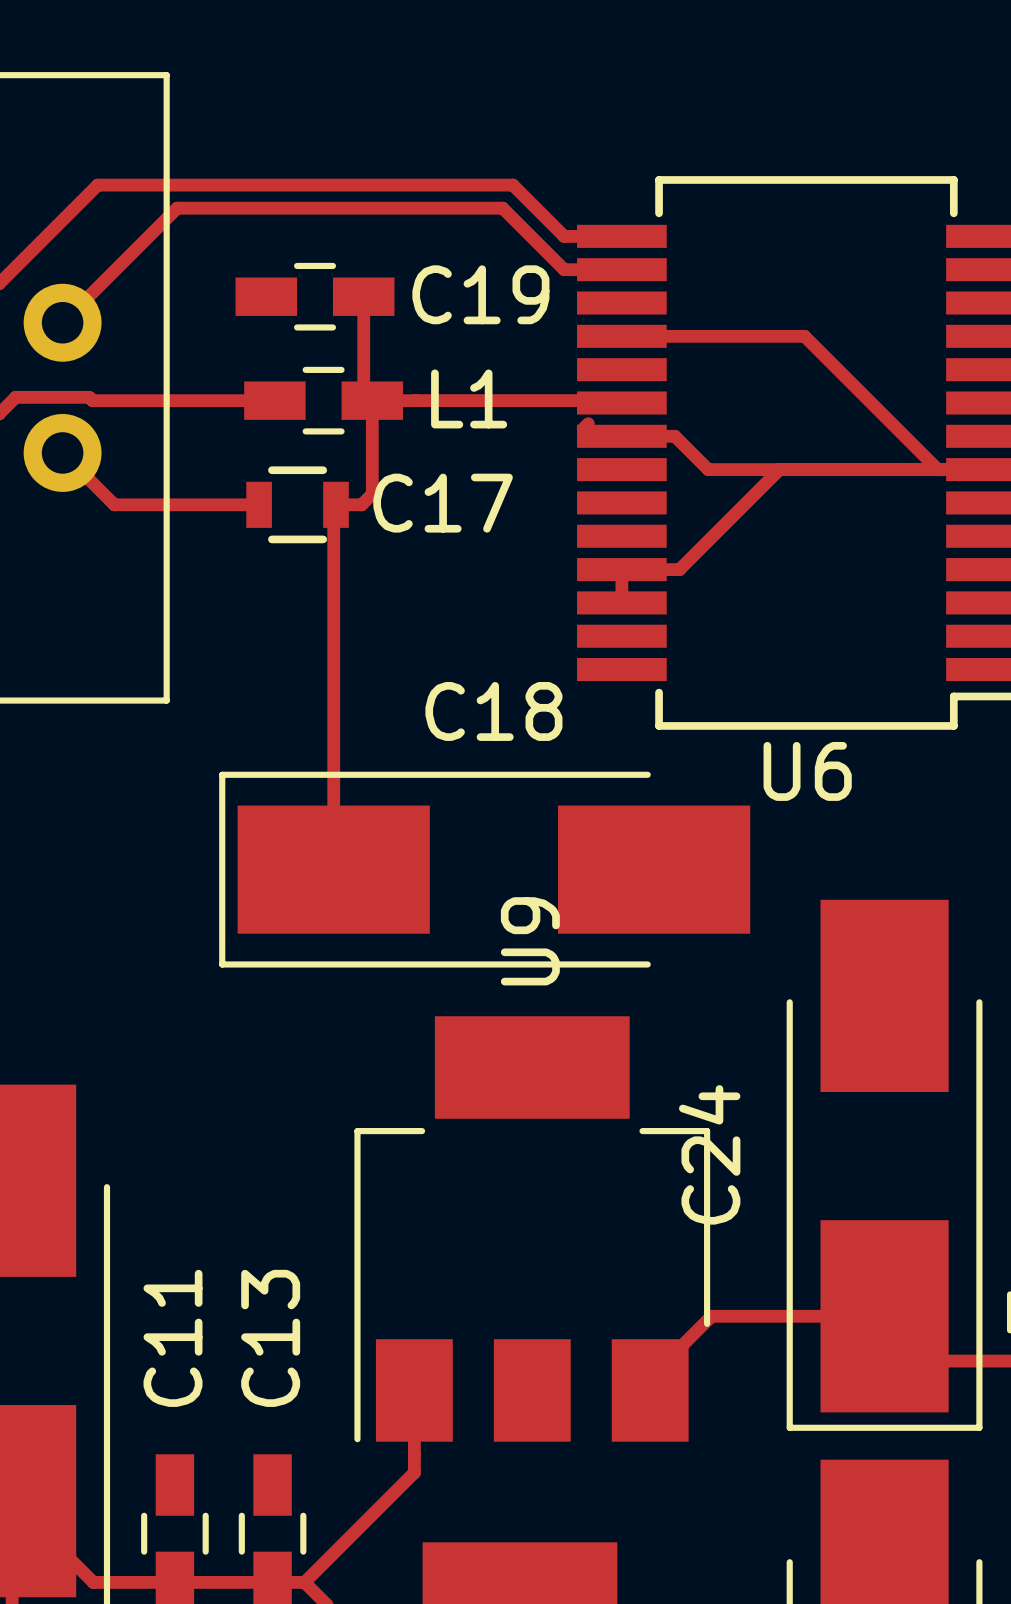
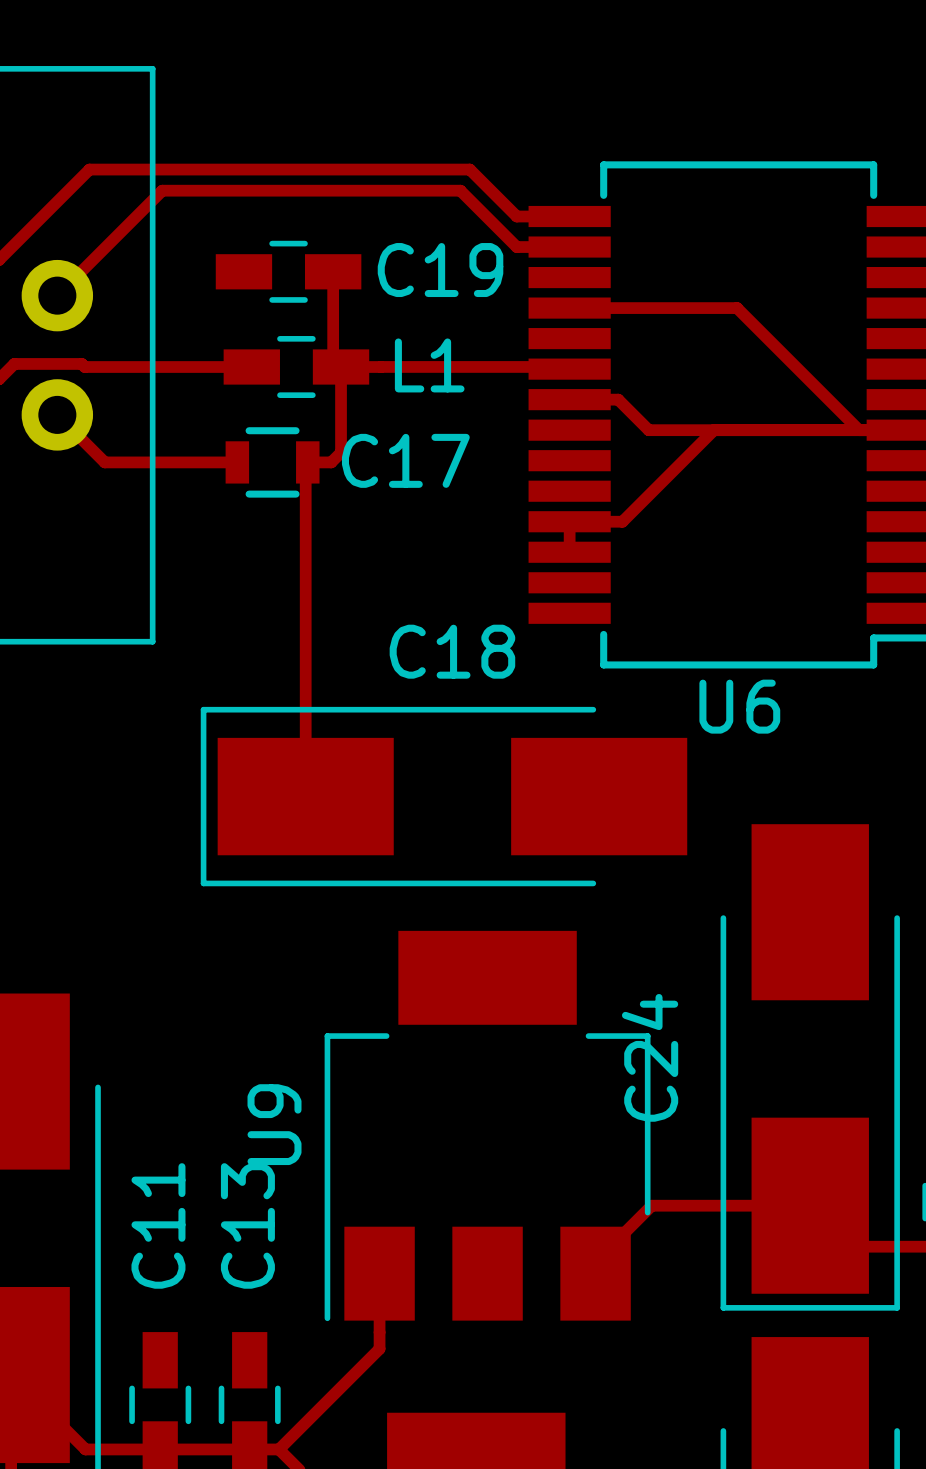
track: (588, 423) (583, 428) -> none
U9 name position: U9 (530, 941) -> U9 (274, 1124)

